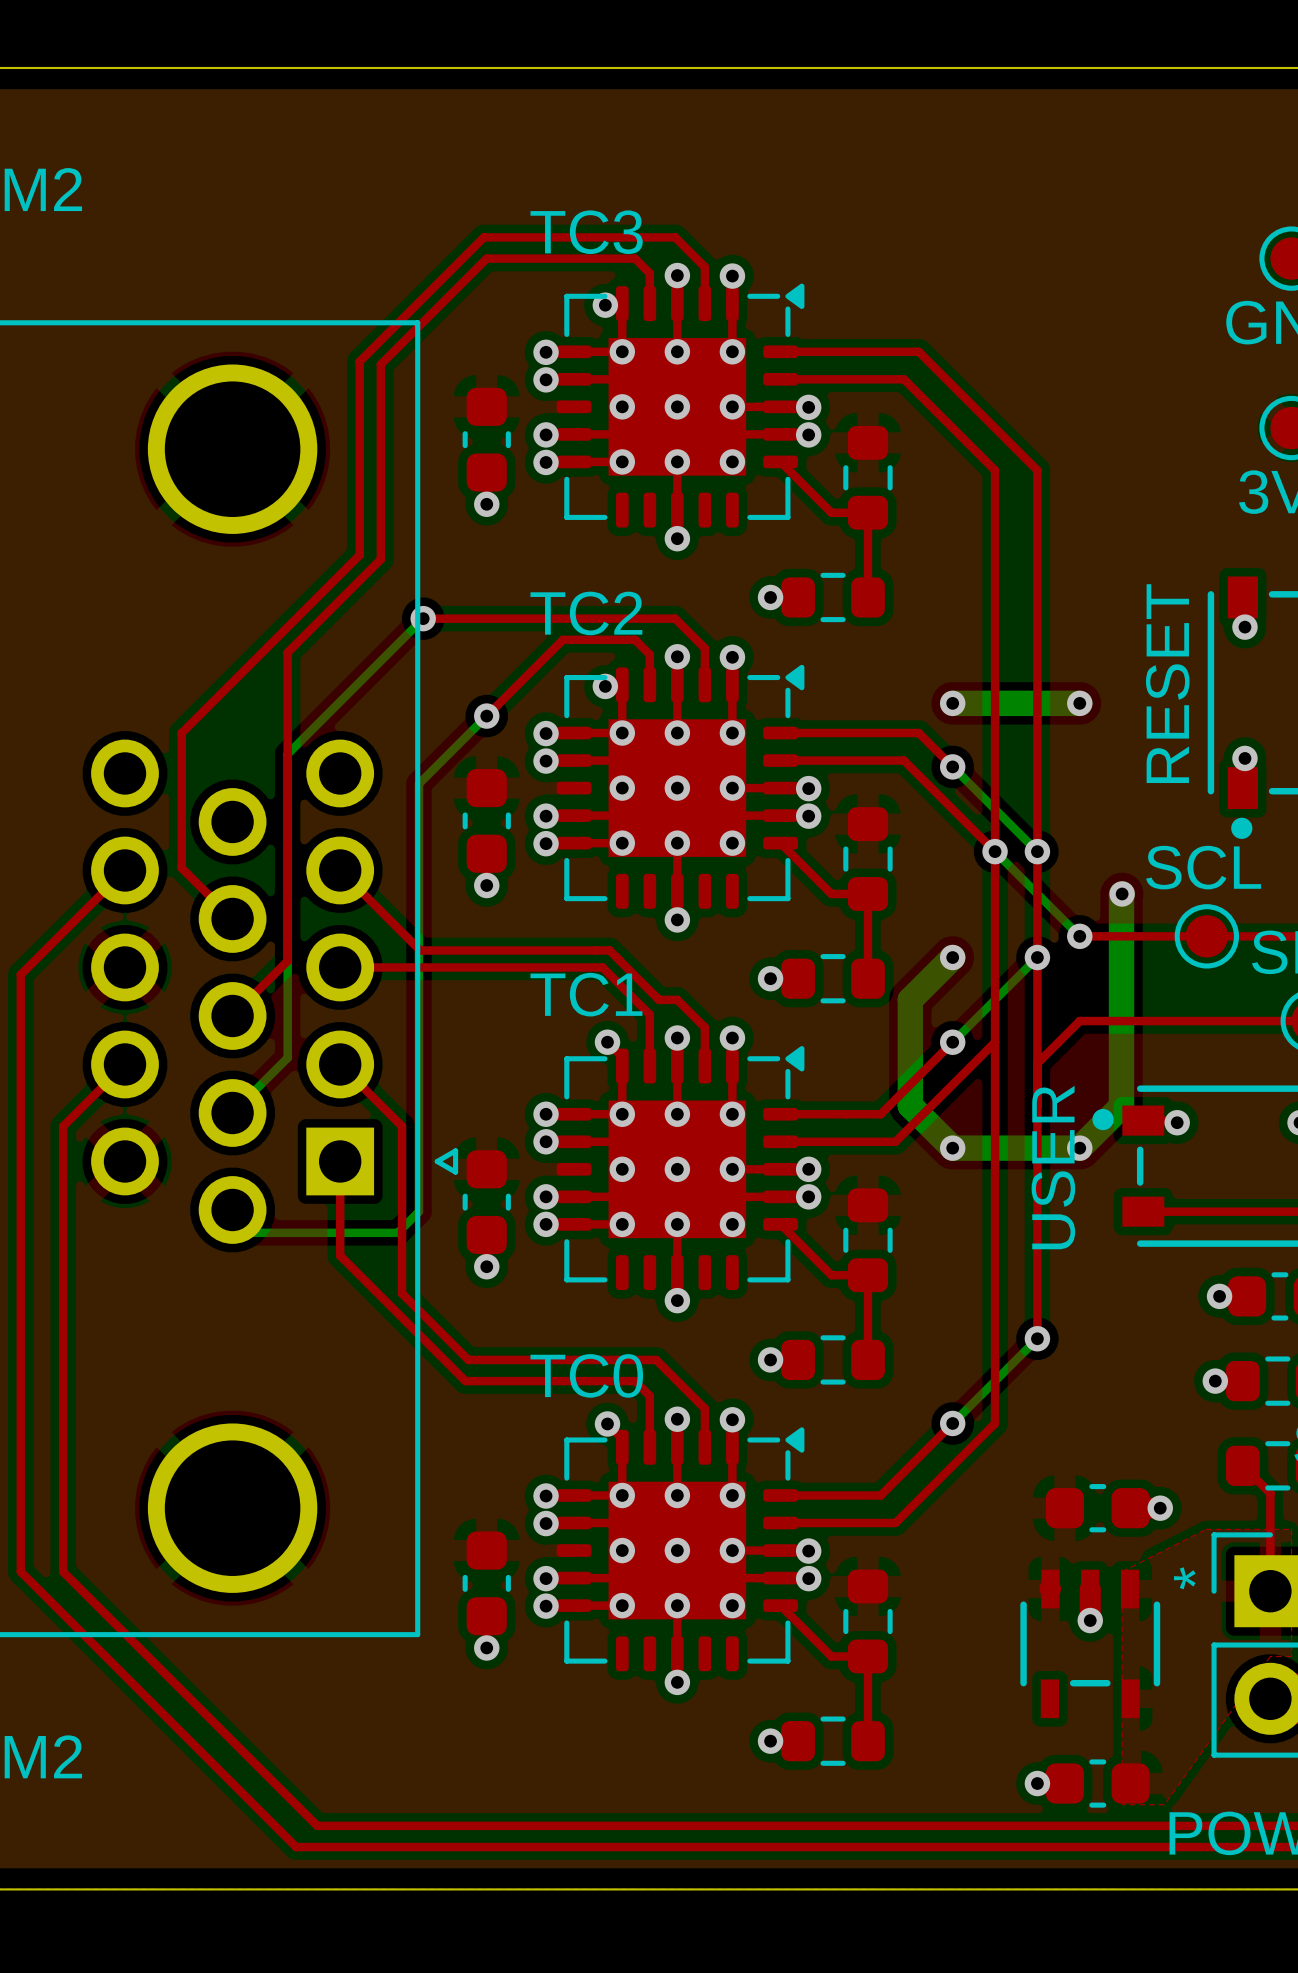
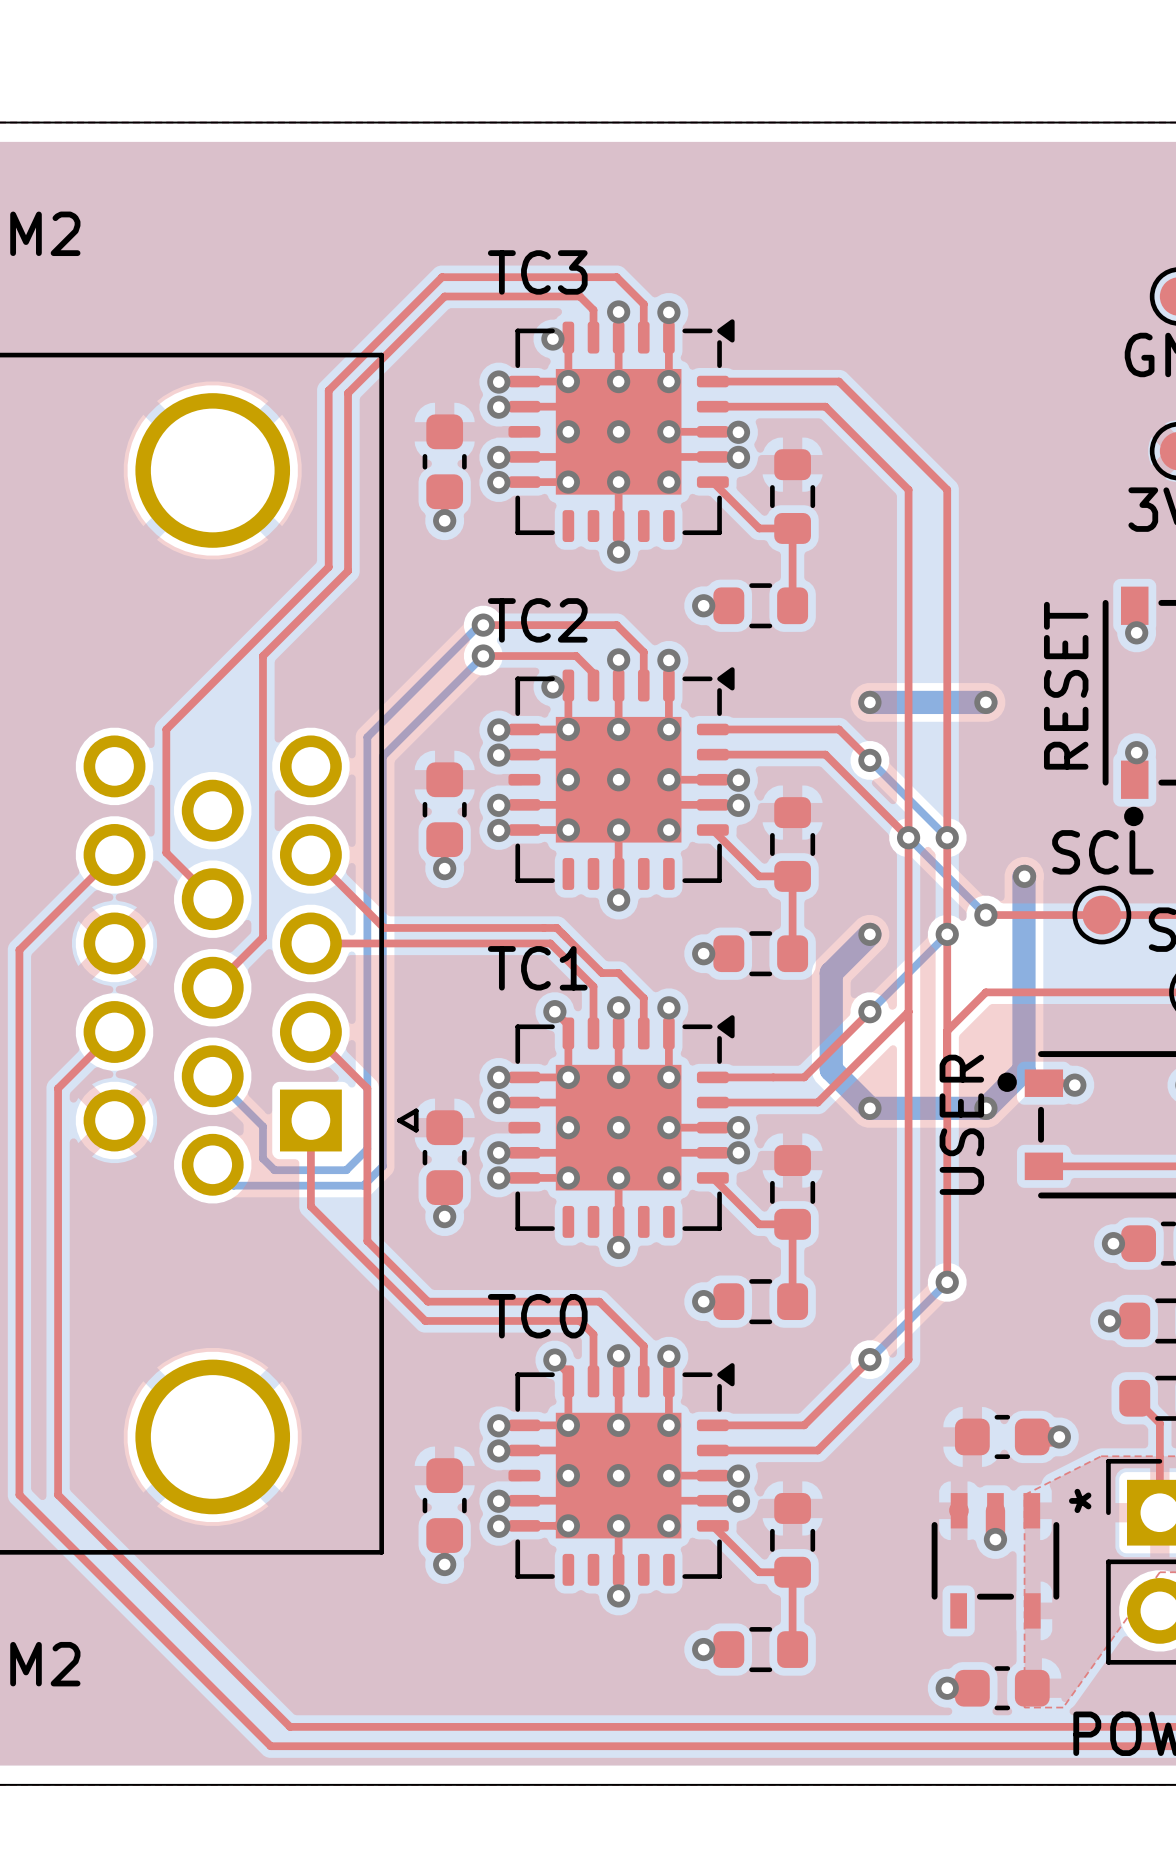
top track: (423, 618) (529, 618) -> none
bottom track: (423, 618) (287, 754) (287, 1057) (232, 1112) -> (483, 625) (479, 625) (367, 737) (367, 1149) (346, 1170) (274, 1170) (262, 1158) (262, 1126) (212, 1076)
via: (423, 618) -> none
via: none -> (483, 625)
via: none -> (483, 656)
top track: (649, 671) (649, 654) (635, 639) (562, 639) (486, 716) -> (593, 673) (576, 656) (483, 656)
bottom track: (486, 716) (418, 783) -> (483, 656) (382, 756) (382, 775)
via: (486, 716) -> none

